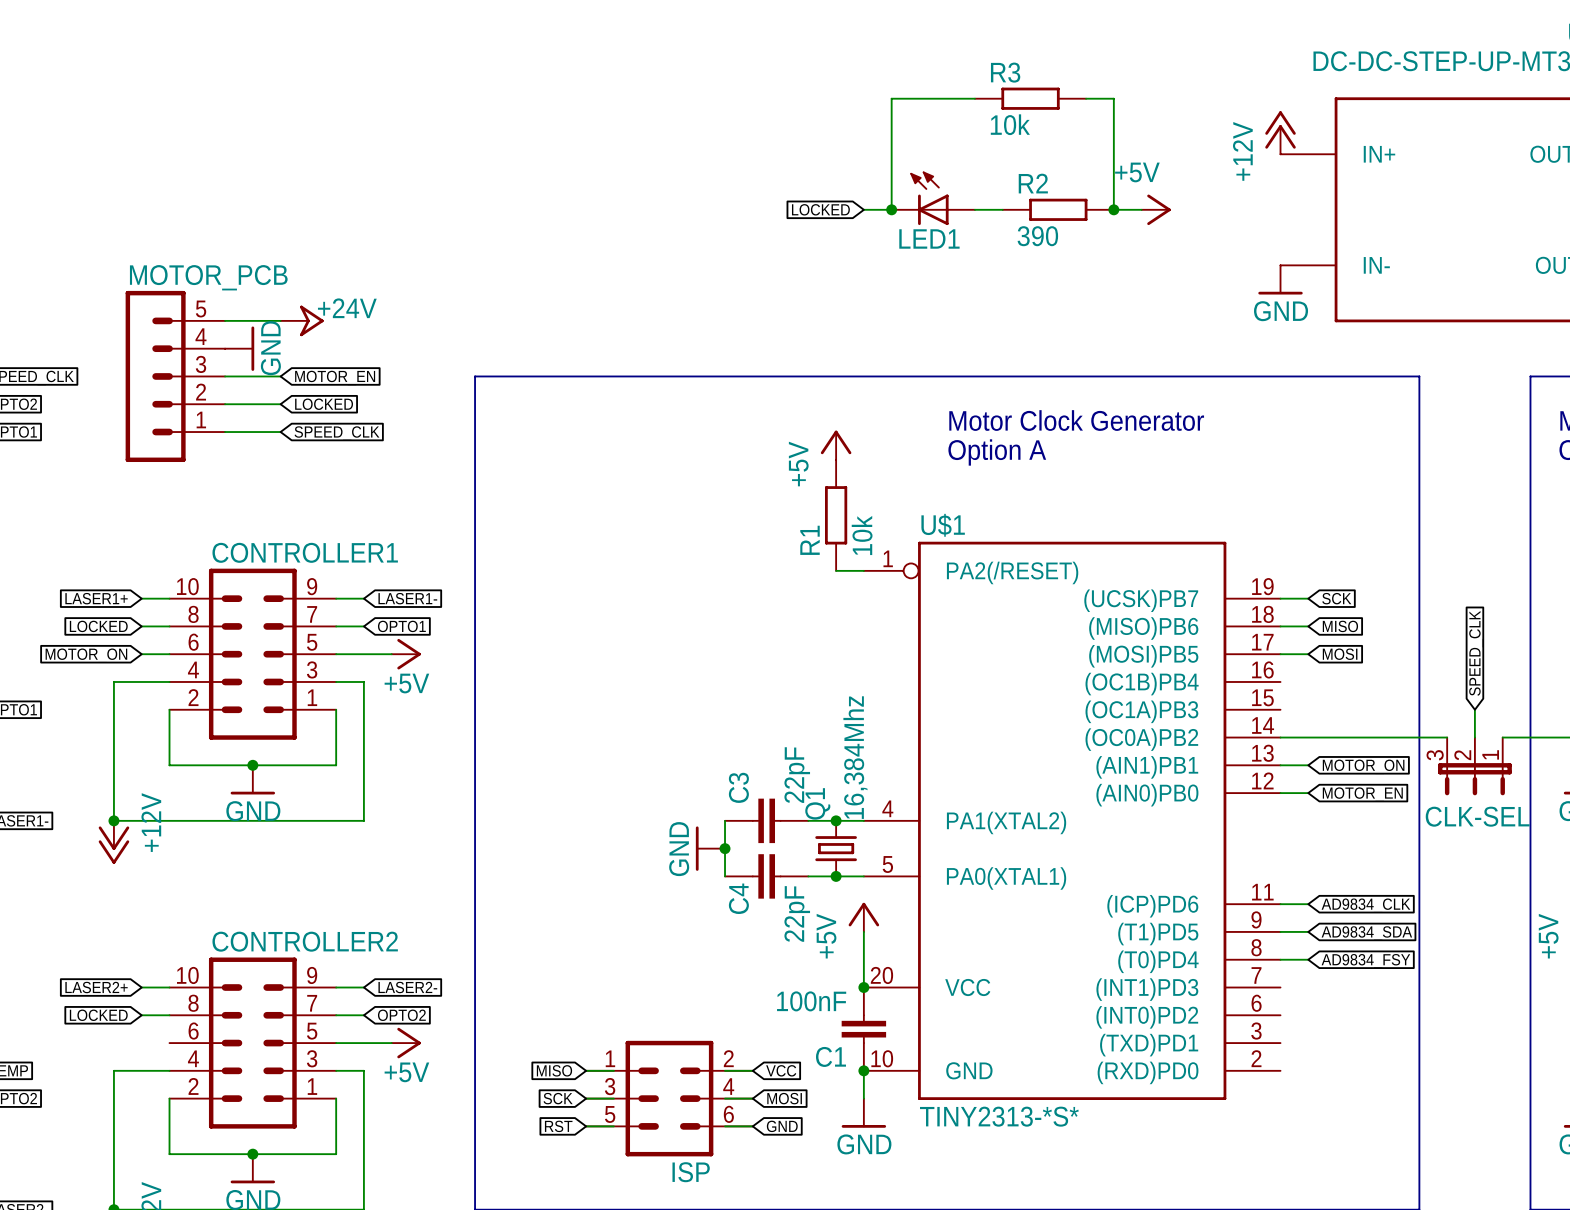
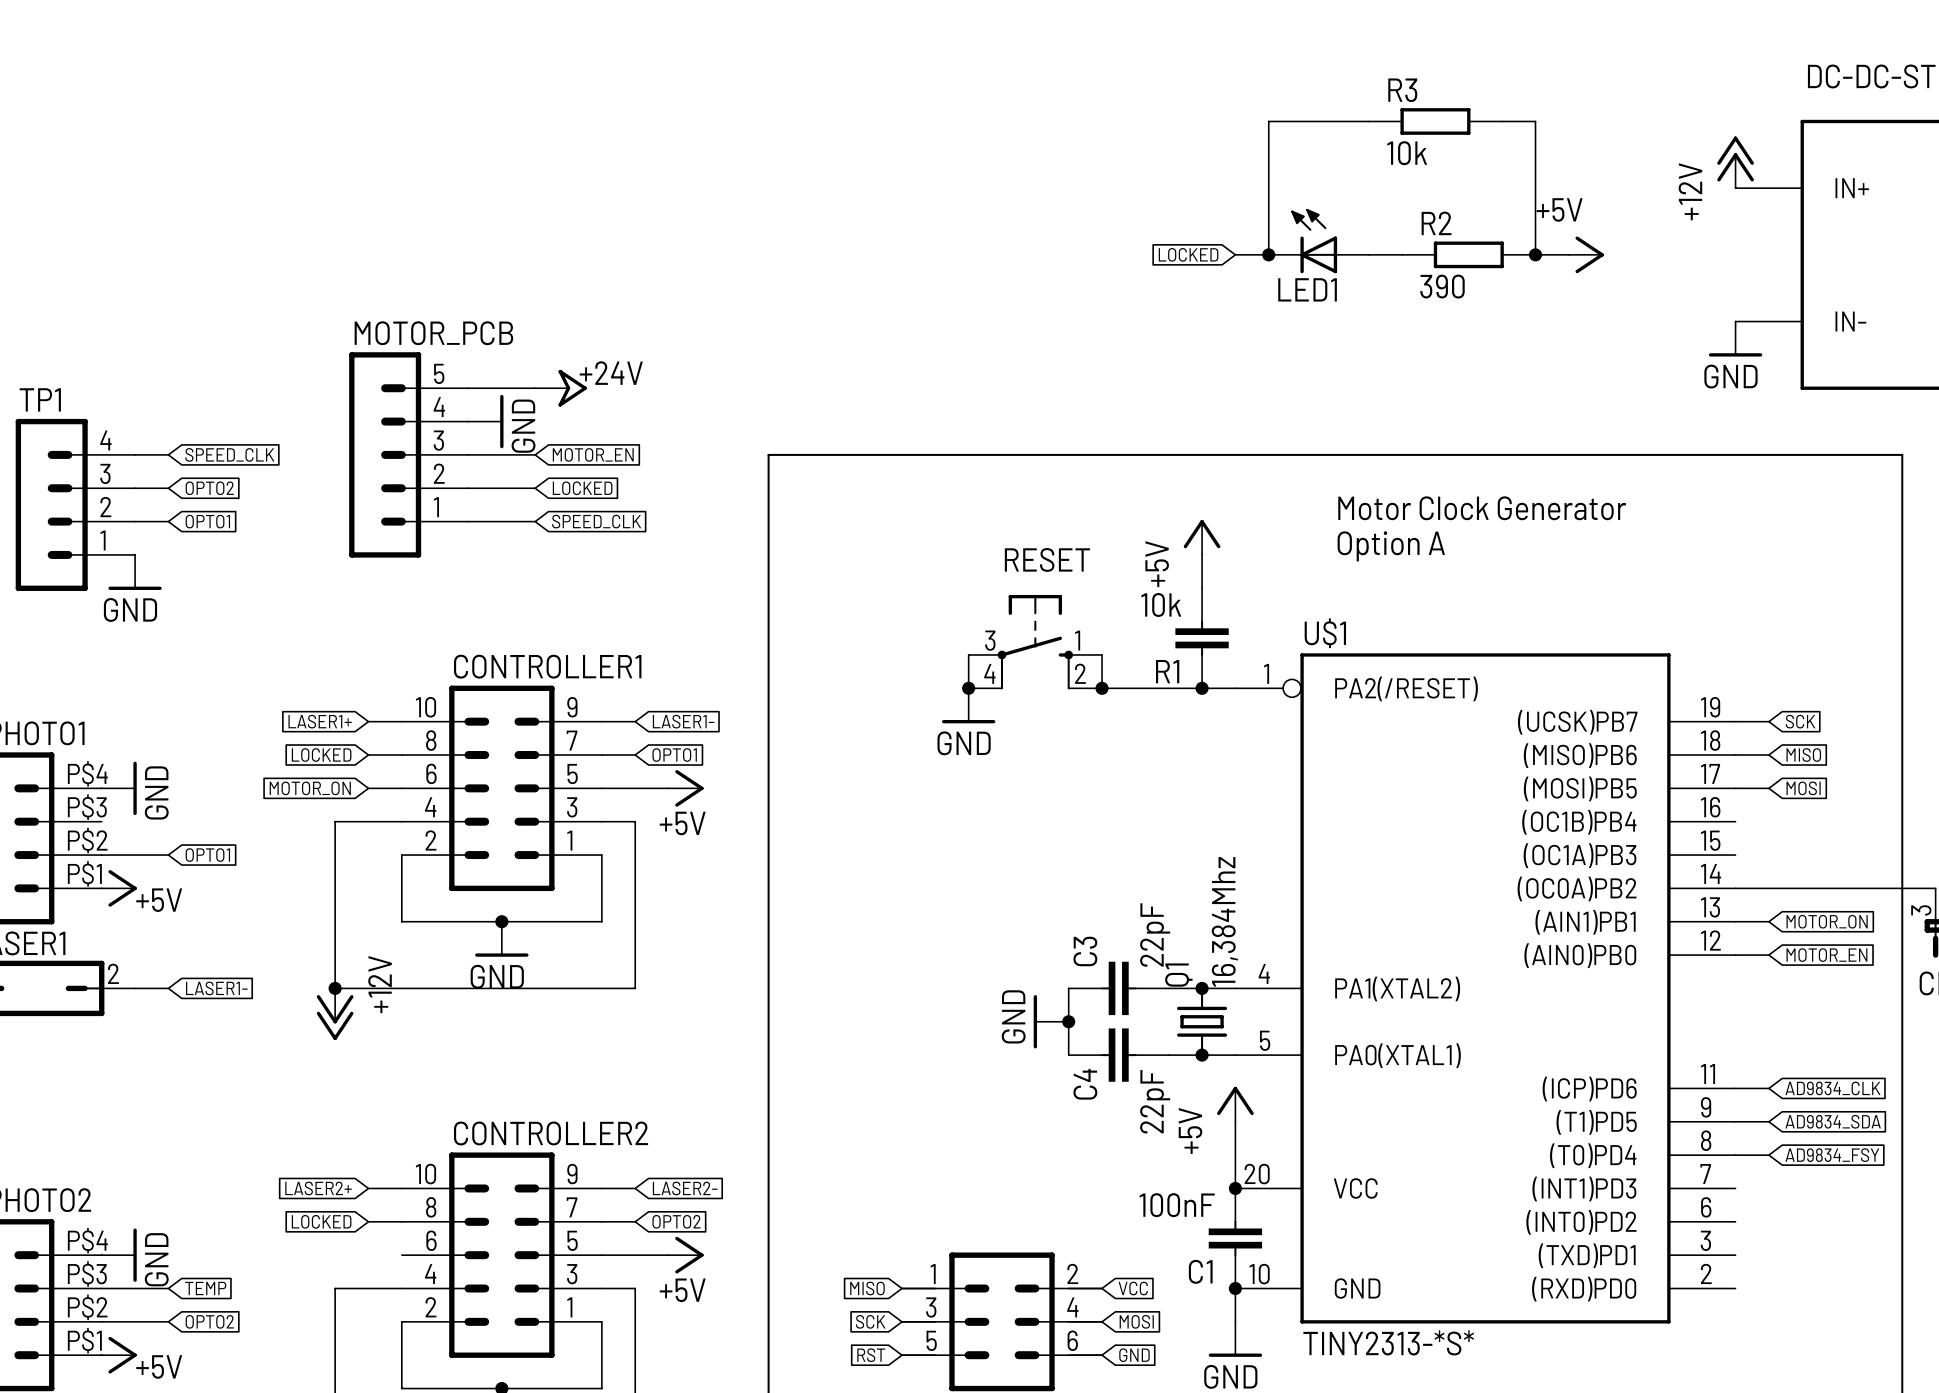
R1 symbol: [825, 459, 848, 571] -> [1175, 588, 1229, 689]
RESET: none -> (1035, 642)
R1 value position: 10k (862, 535) -> 10k (1161, 604)
wire: none -> (968, 654) (968, 688)
wire: none -> (1102, 654) (1102, 688) (1202, 688)
junction: none -> (968, 688)
junction: none -> (1102, 688)
junction: none -> (1202, 688)
power symbol: none -> GND (968, 705)

